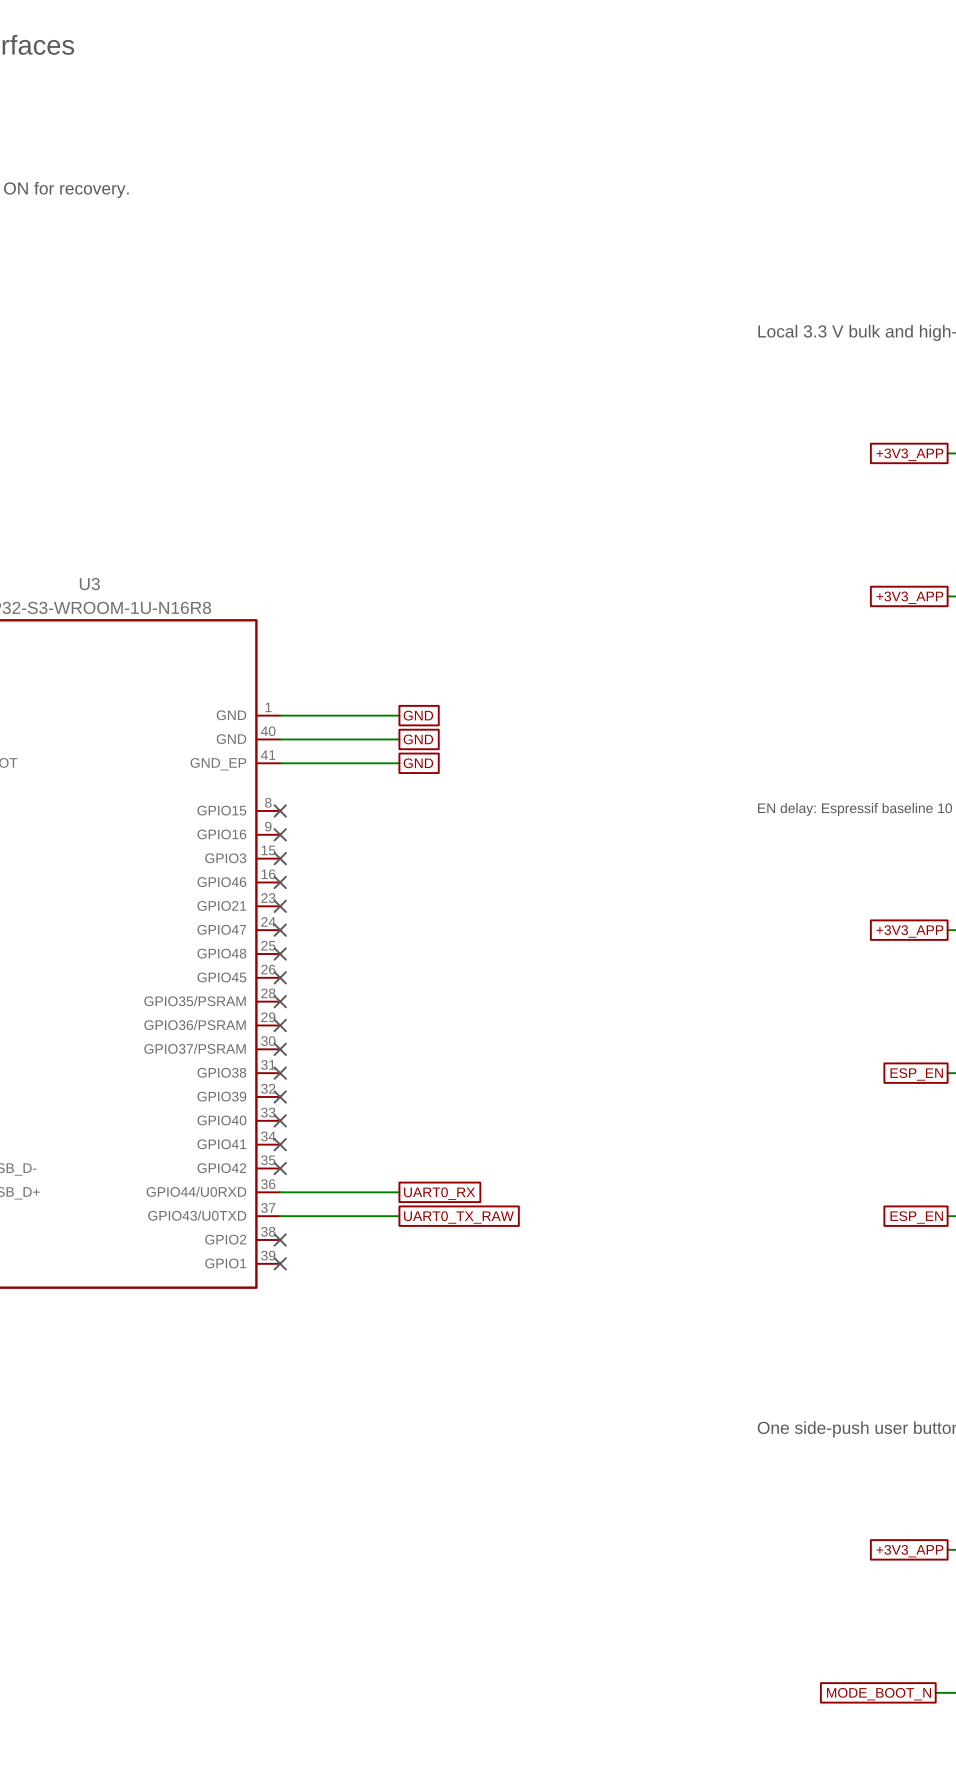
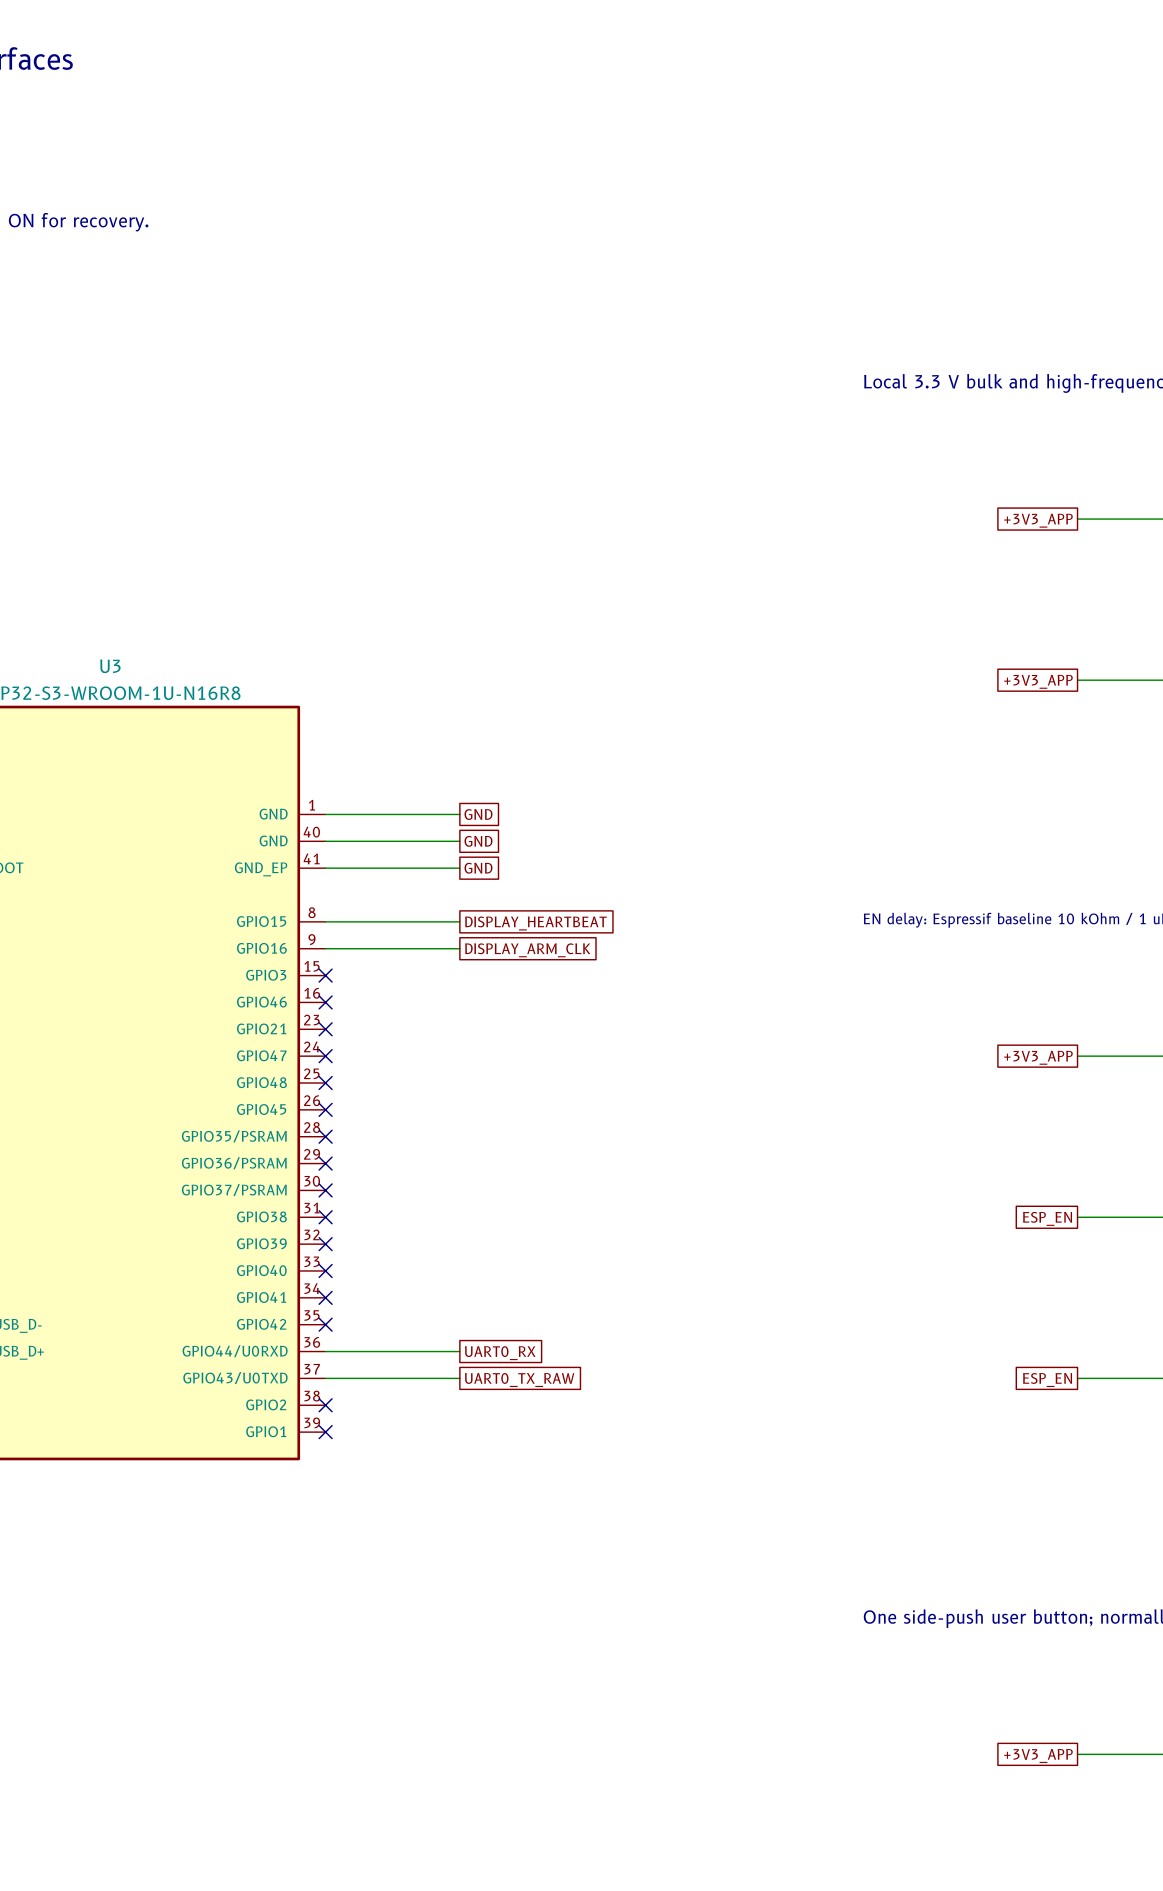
wire: none -> (325, 921) (459, 921)
no-connect mark: (280, 810) -> none
global label: none -> DISPLAY_HEARTBEAT (535, 923)
wire: none -> (325, 948) (459, 948)
no-connect mark: (280, 834) -> none
global label: none -> DISPLAY_ARM_CLK (527, 950)

